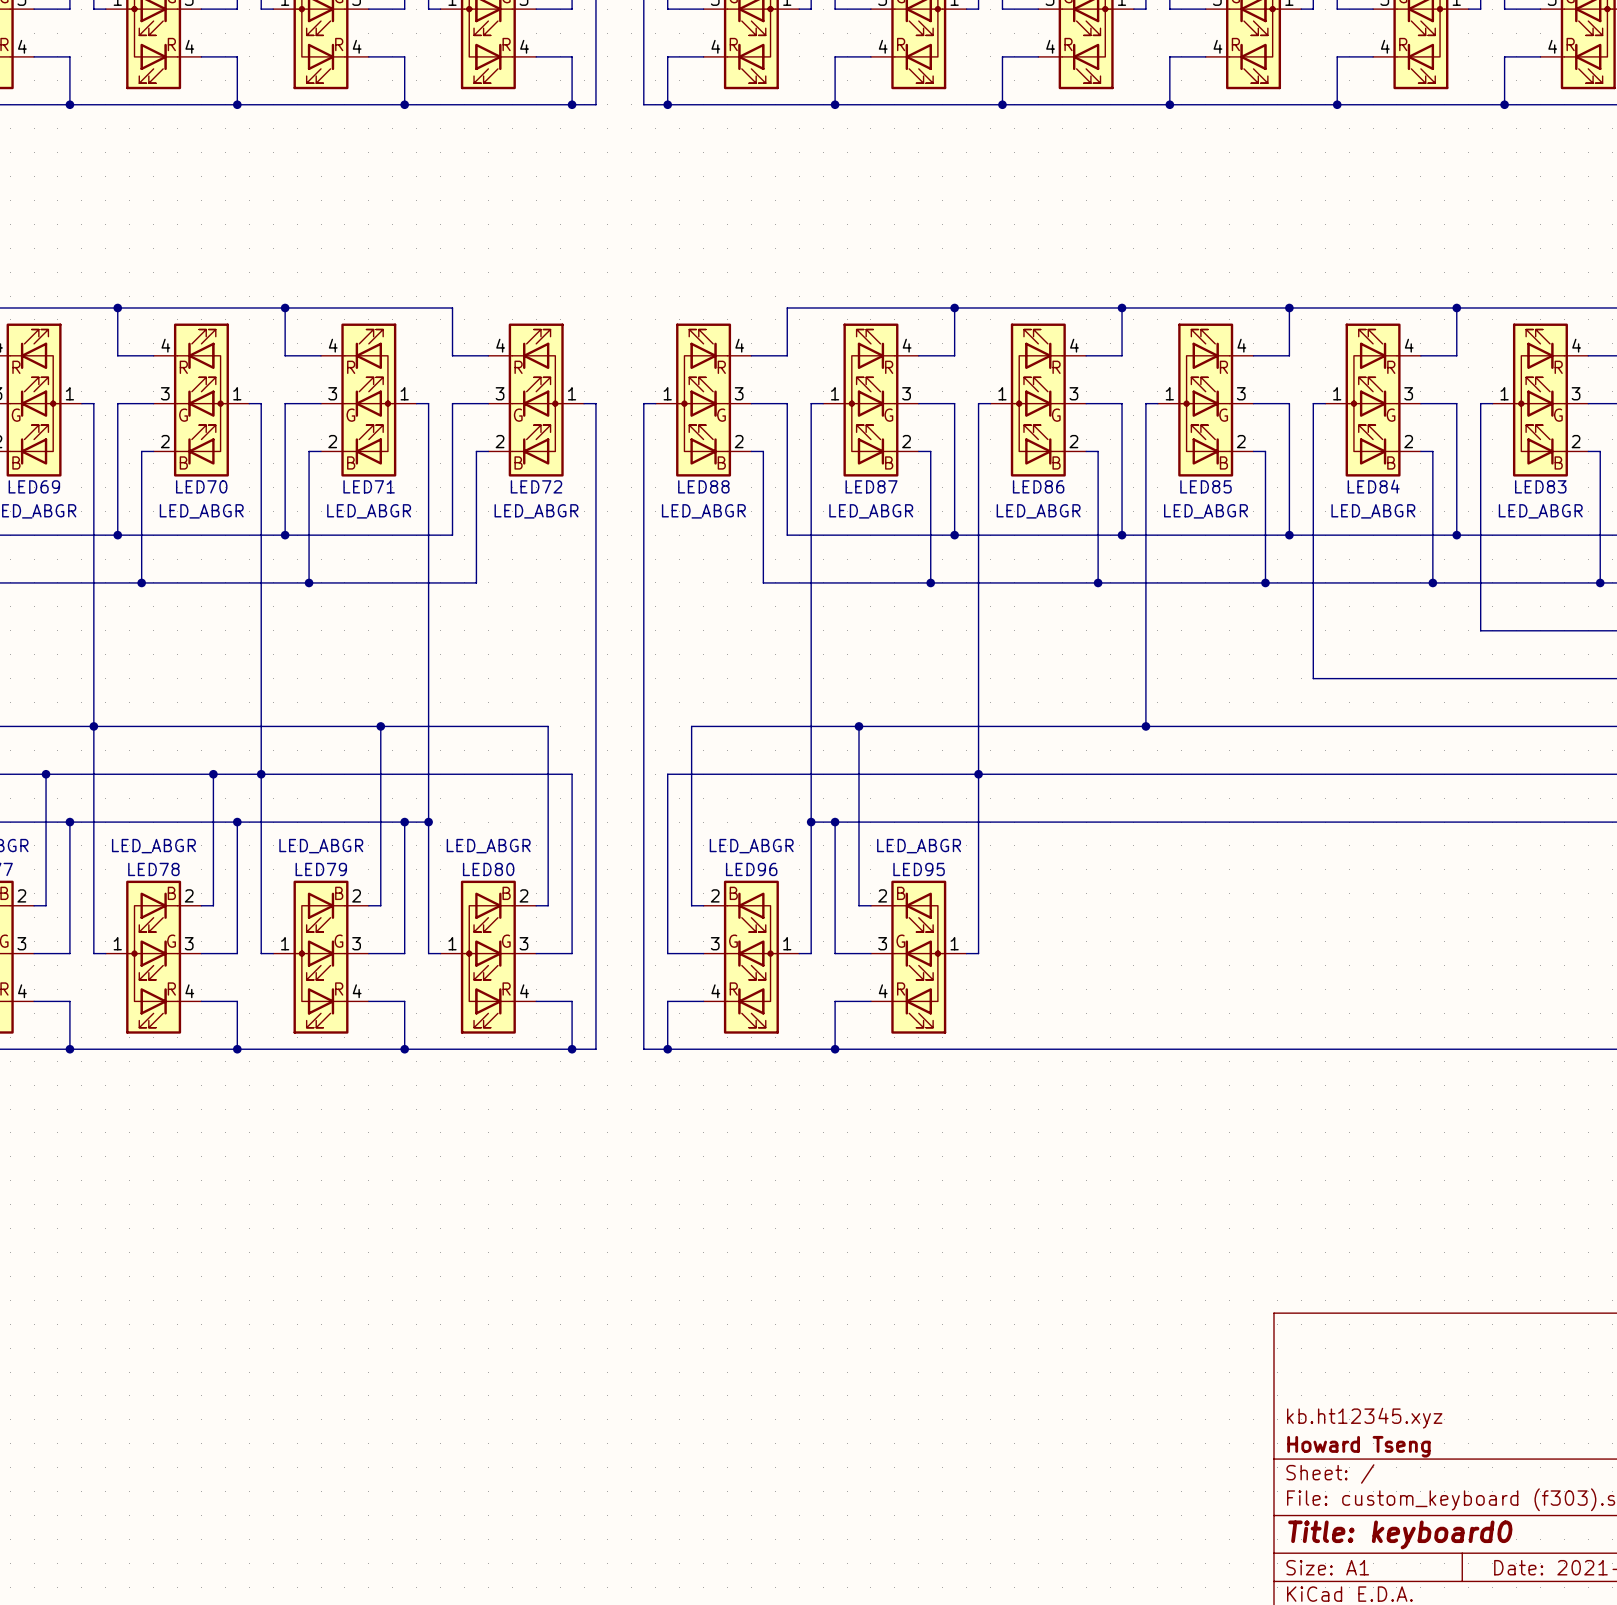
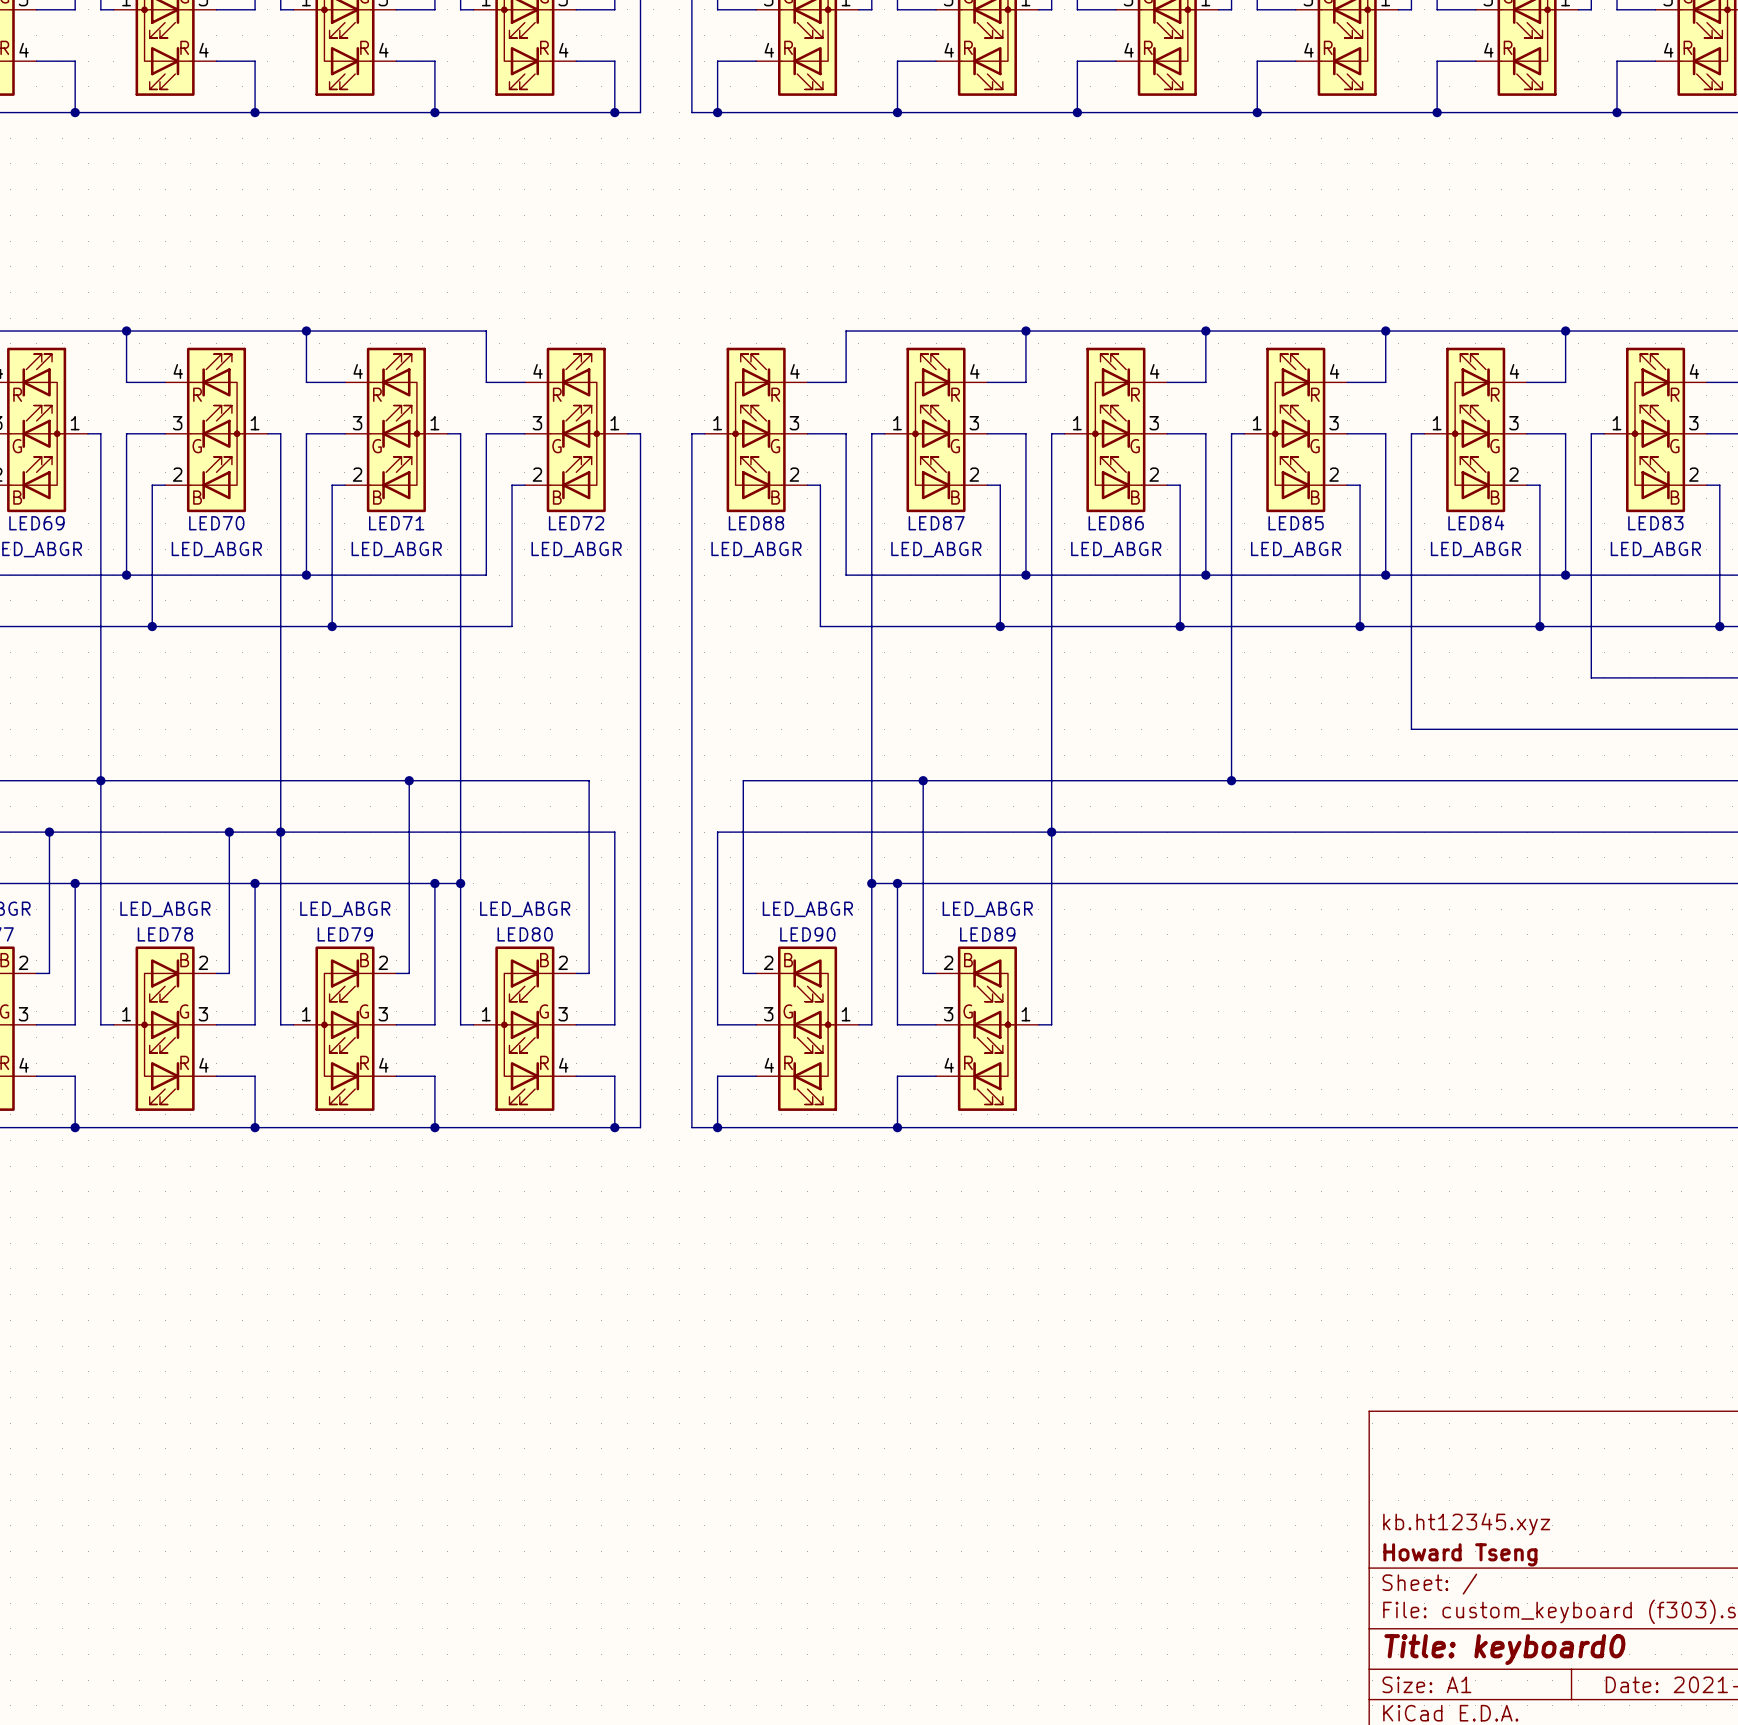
LED96 name: LED96 (751, 869) -> LED90 (807, 934)
LED95 name: LED95 (919, 869) -> LED89 (987, 934)

